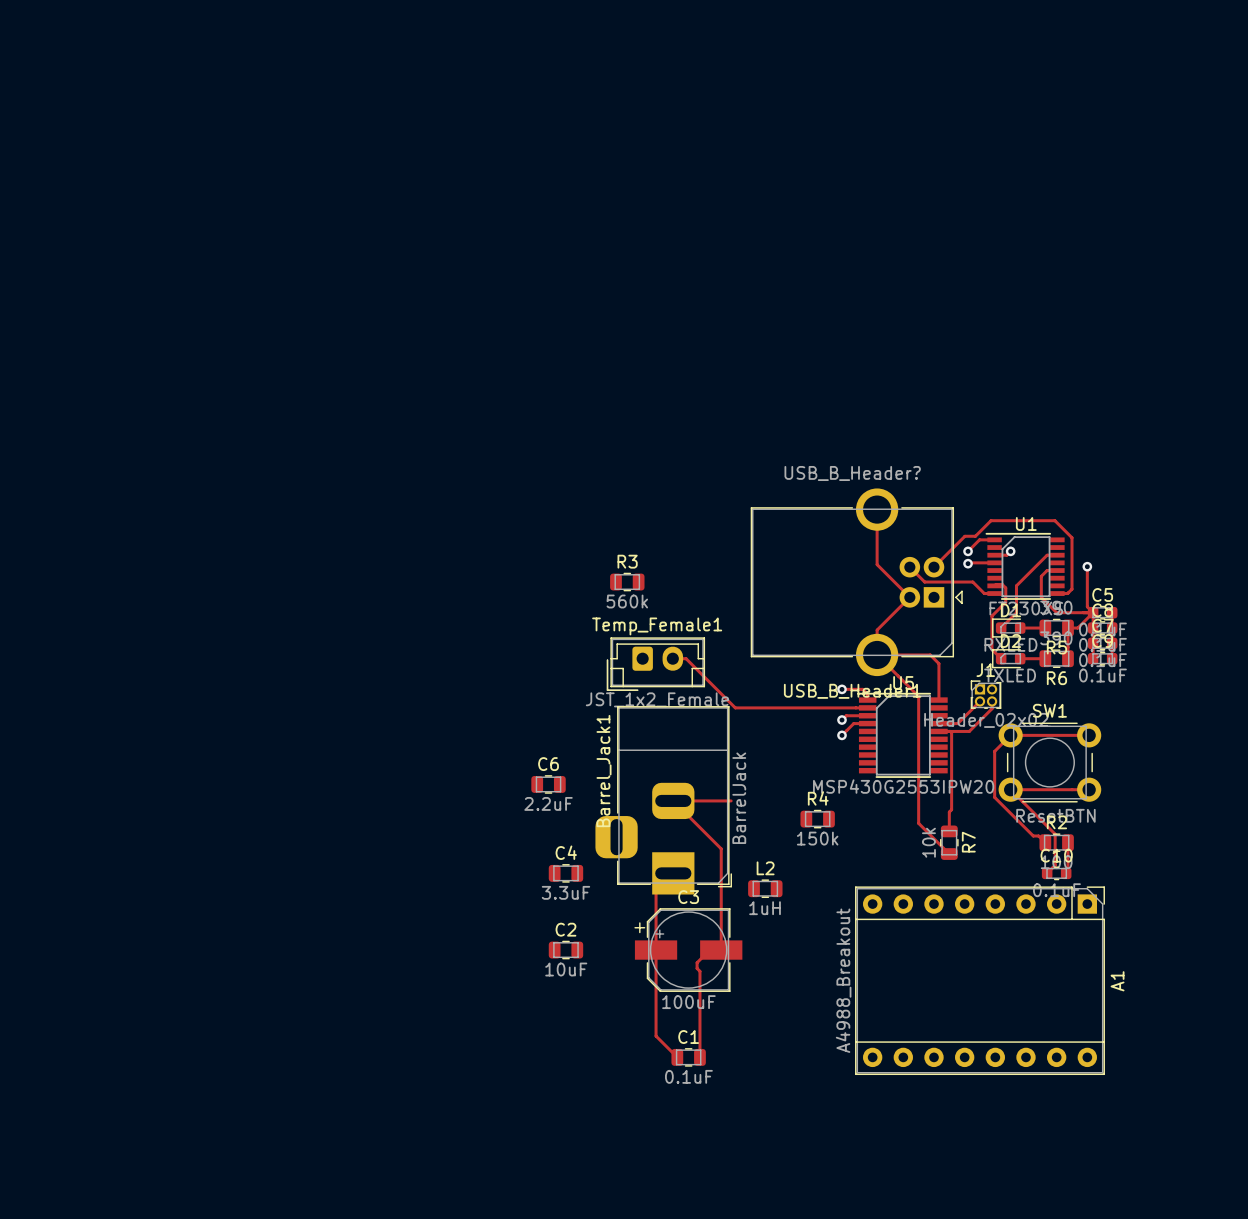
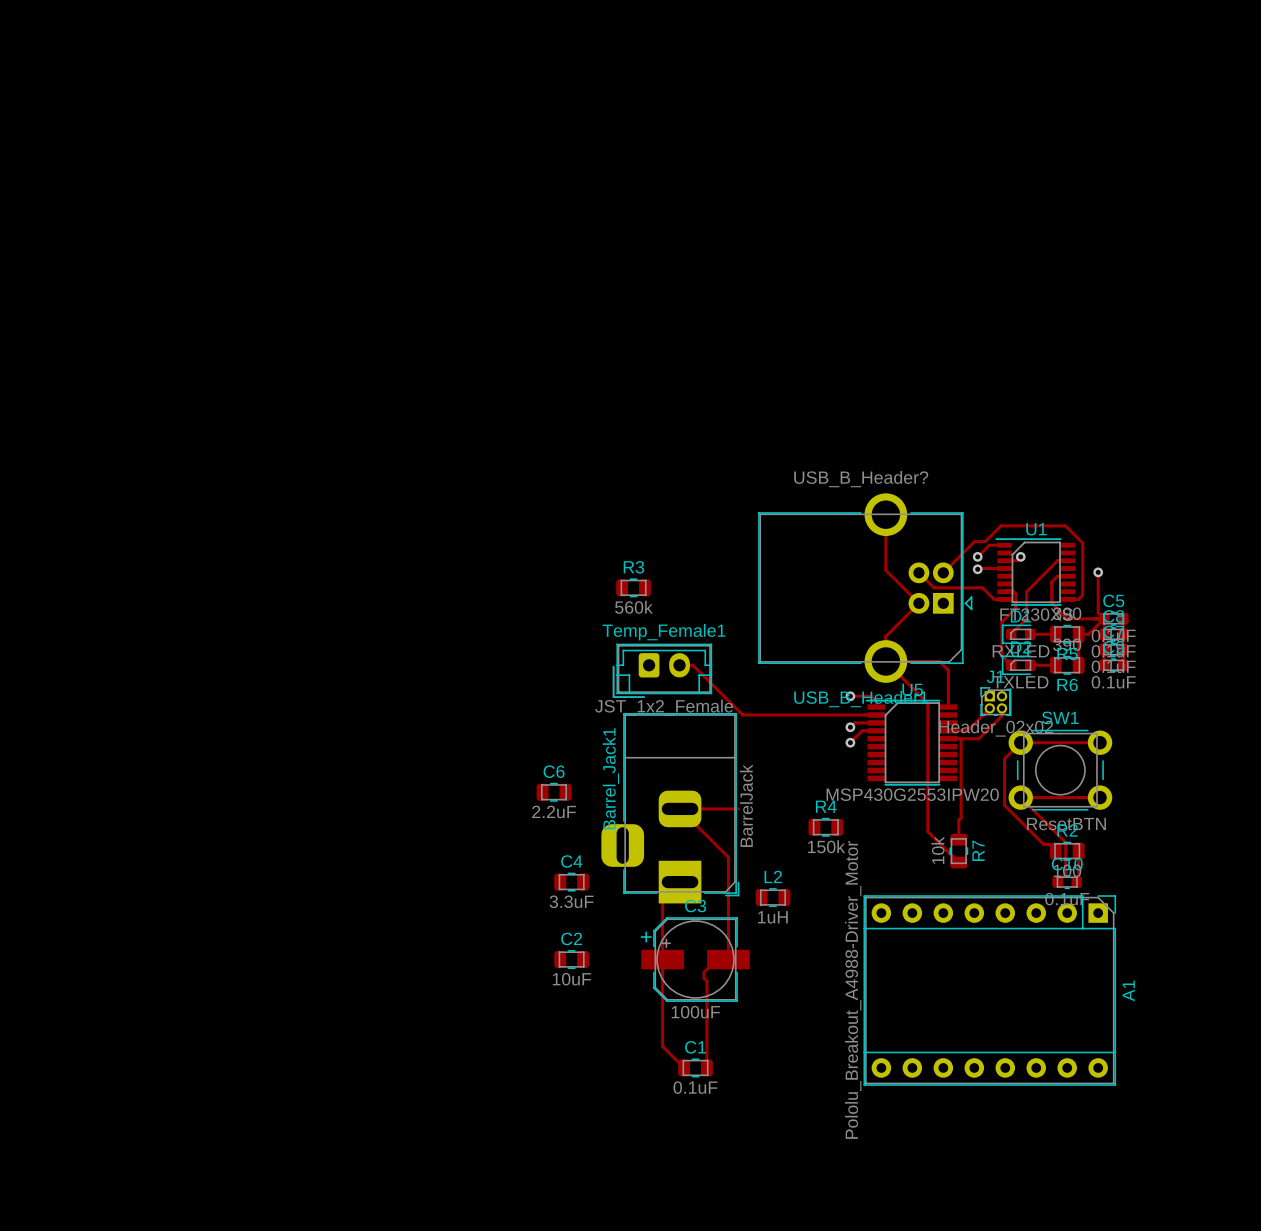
A1 value: A4988_Breakout (843, 980) -> Pololu_Breakout_A4988-Driver_Motor (853, 989)

